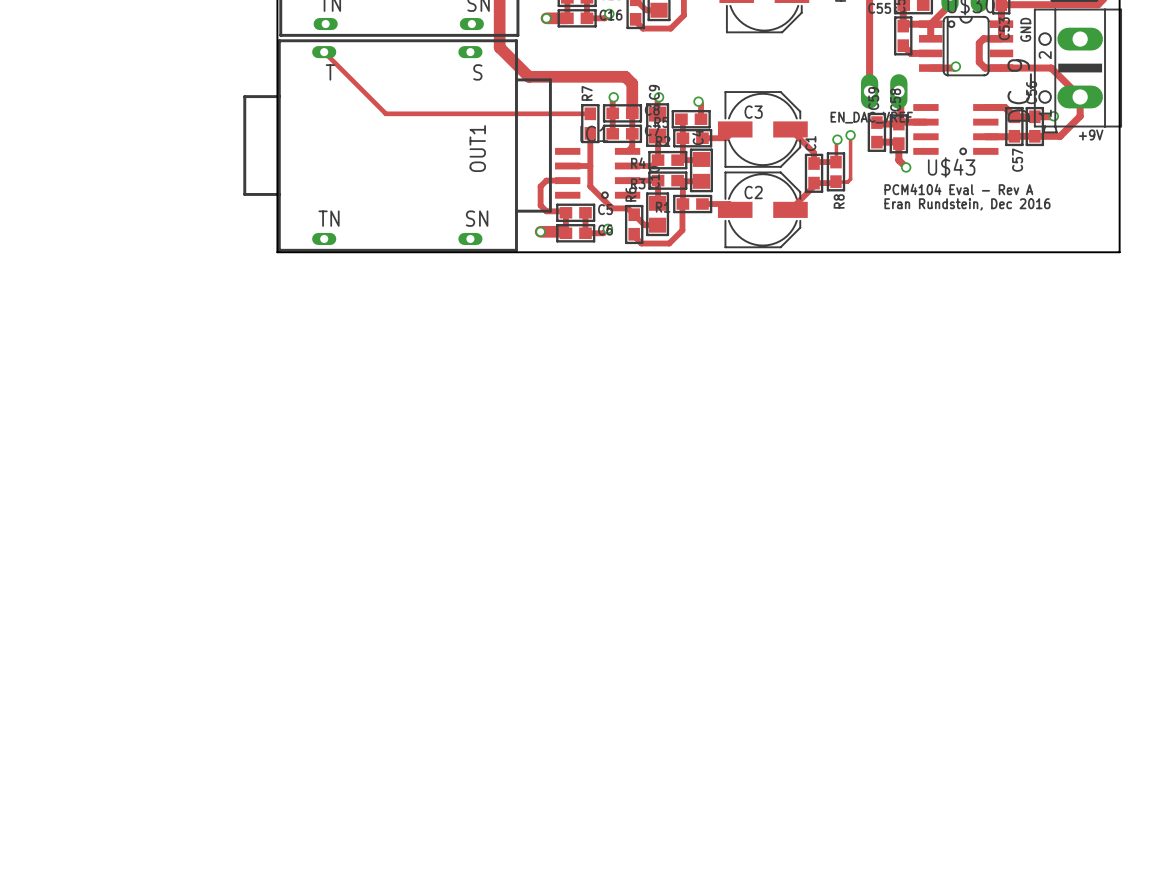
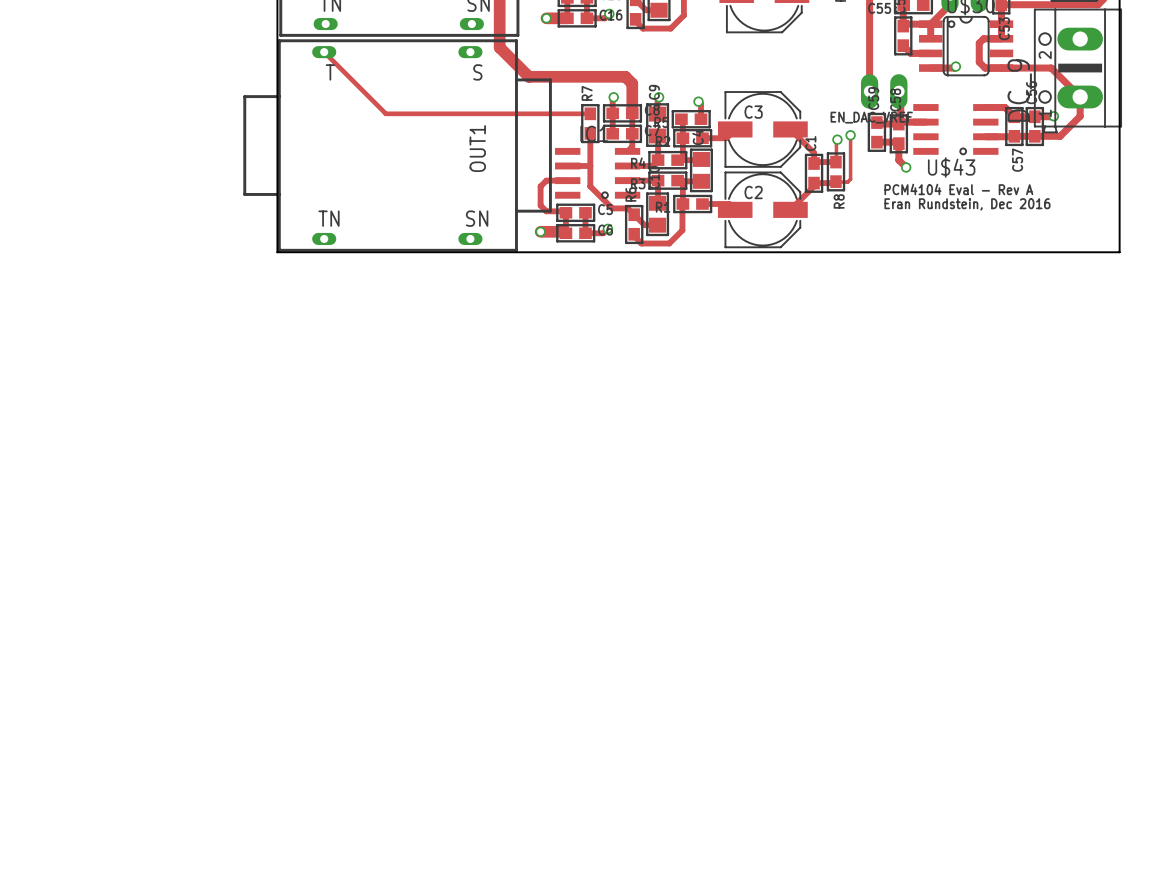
text: GND (1025, 29) -> none
text: +9V (1091, 135) -> none

